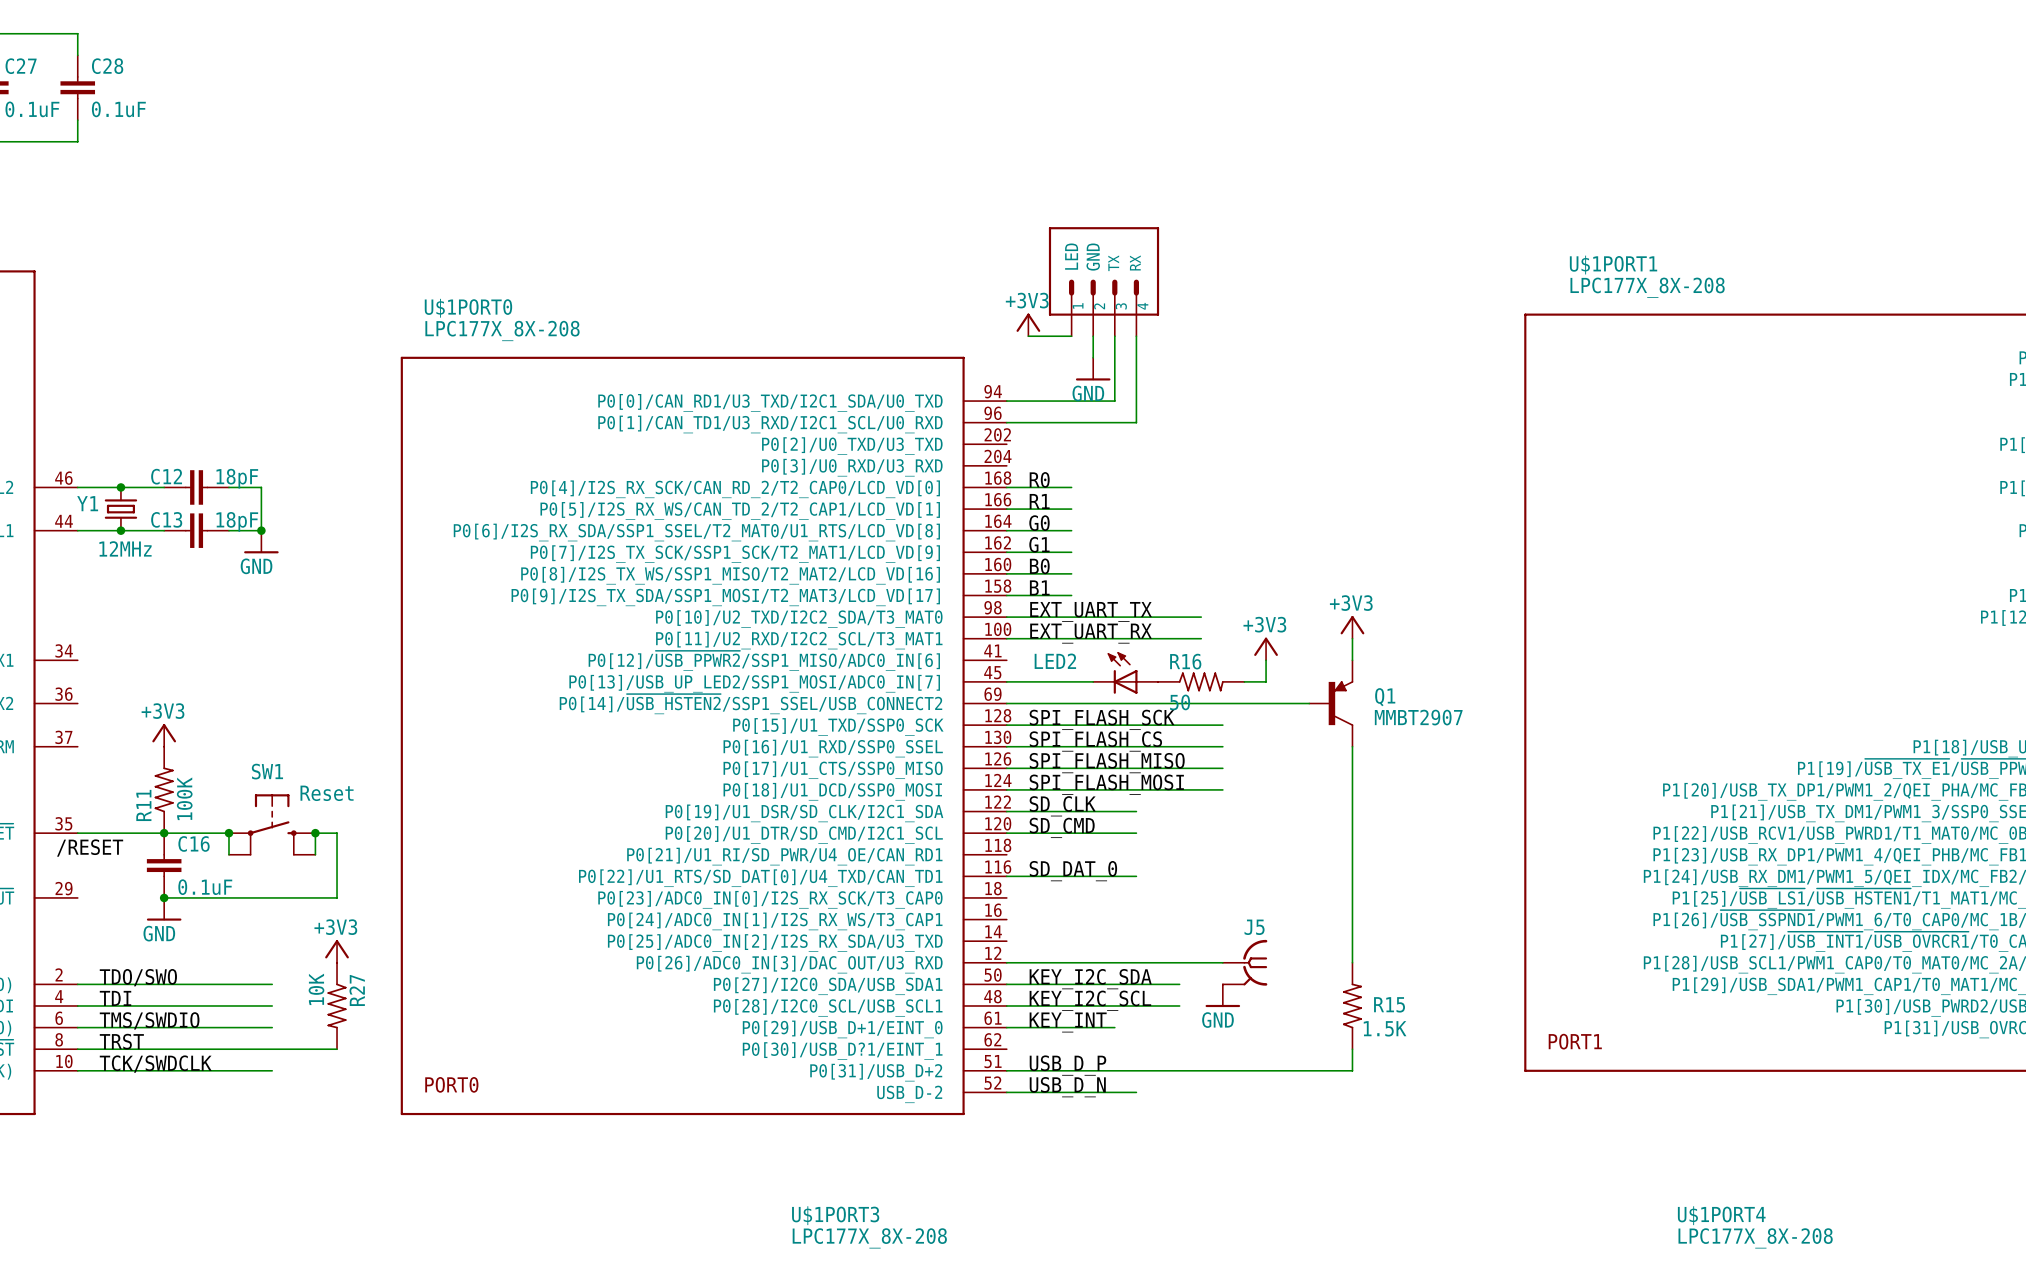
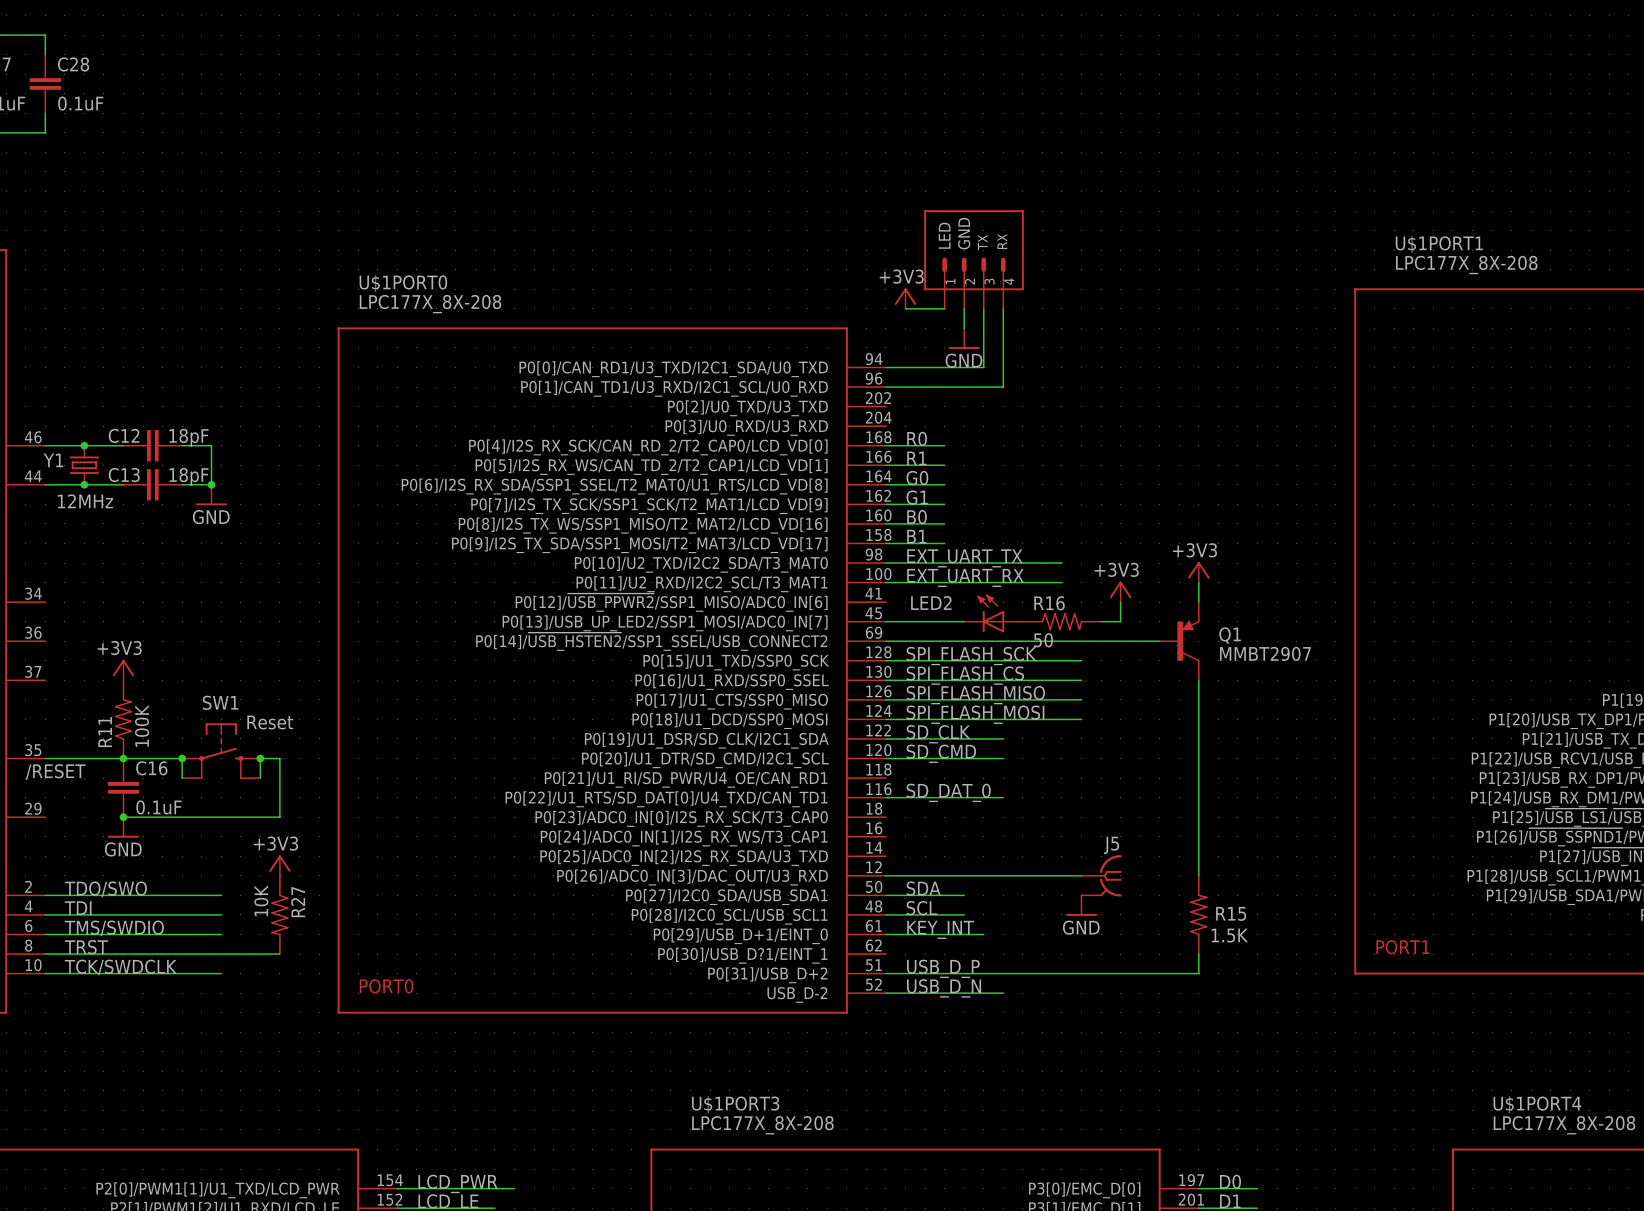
label: KEY_I2C_SDA (1090, 979) -> SDA (923, 888)
wire: (1093, 984) (1179, 984) -> none
label: KEY_I2C_SCL (1090, 1000) -> SCL (922, 908)
wire: (1093, 1005) (1179, 1005) -> none

